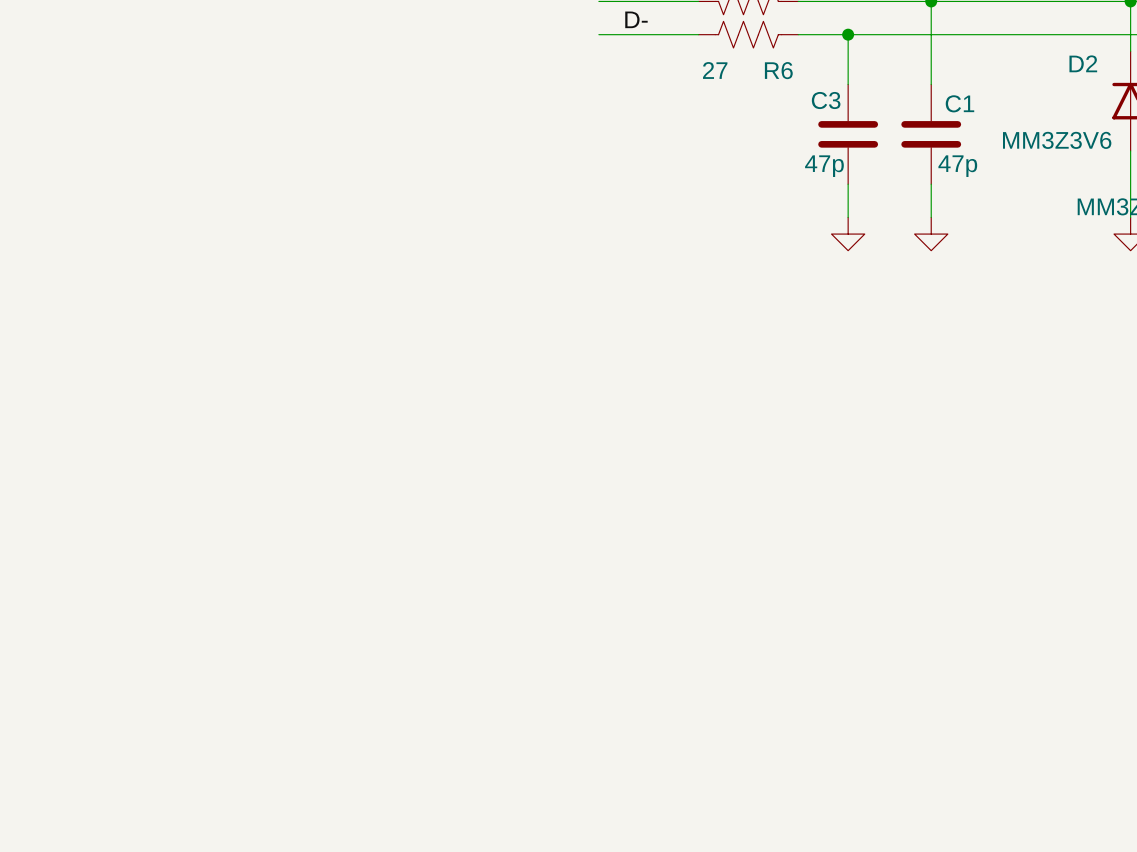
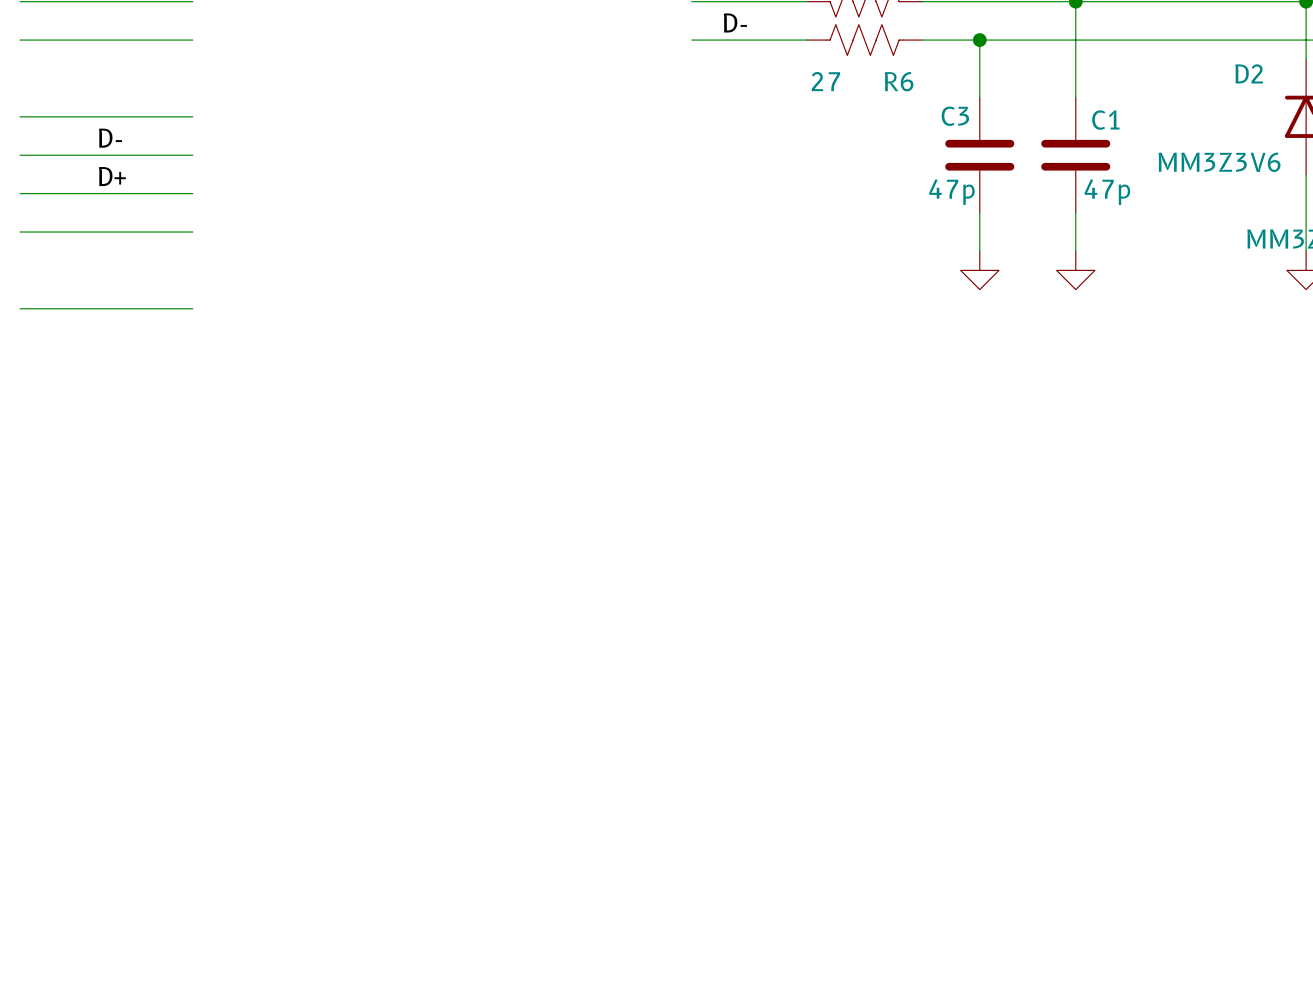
wire: none -> (20, 1) (192, 1)
wire: none -> (20, 40) (192, 40)
wire: none -> (20, 116) (192, 116)
label: none -> D- (110, 138)
wire: none -> (20, 155) (192, 155)
label: none -> D+ (112, 176)
wire: none -> (20, 193) (192, 193)
wire: none -> (20, 232) (192, 232)
wire: none -> (20, 308) (192, 308)

